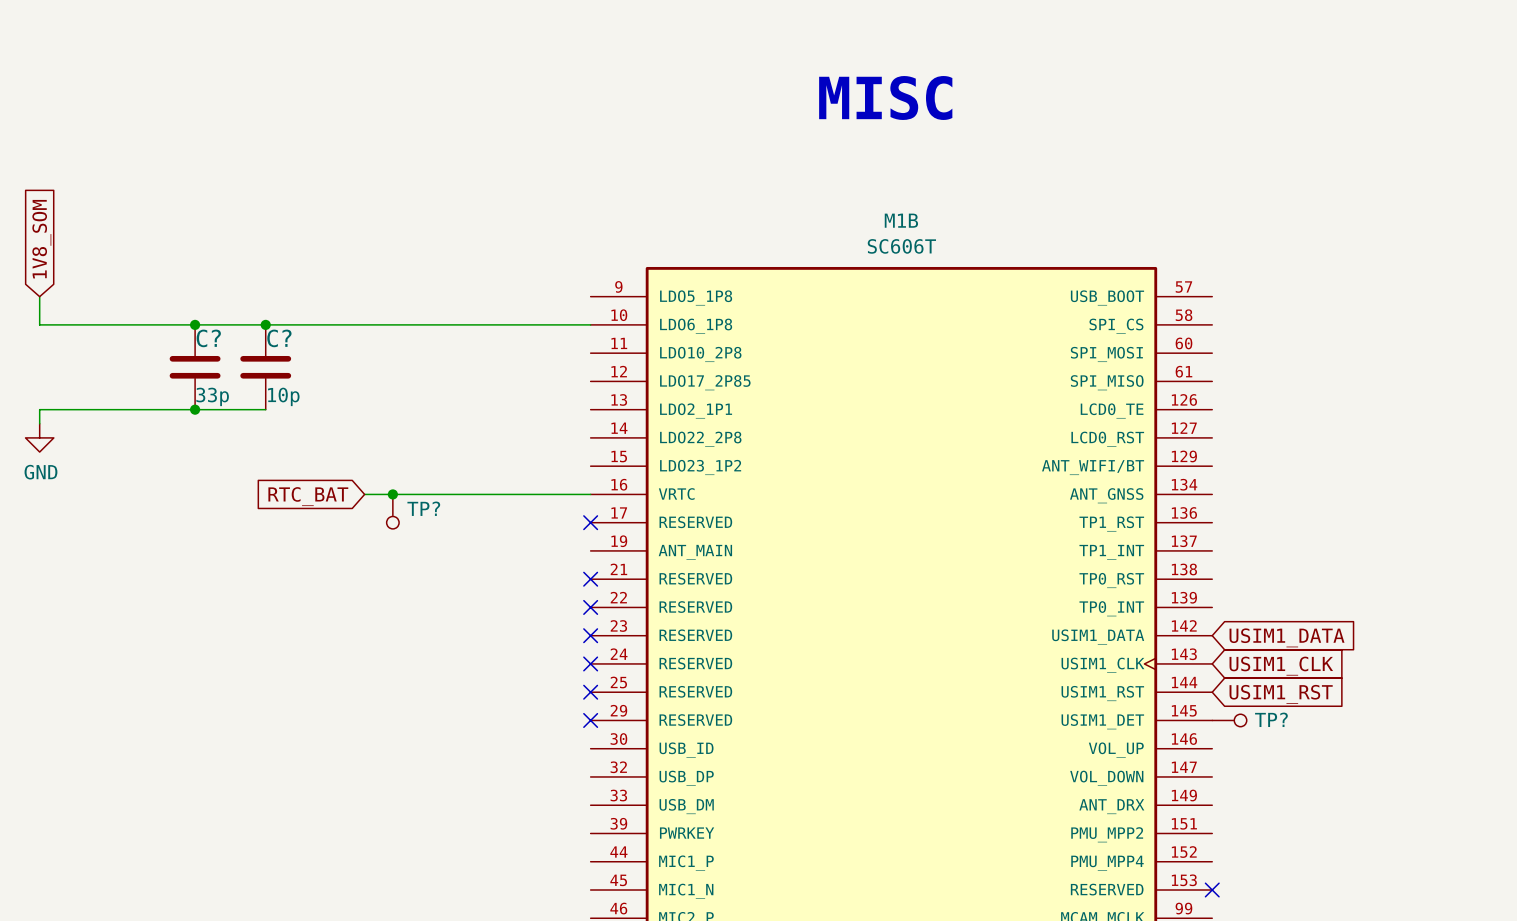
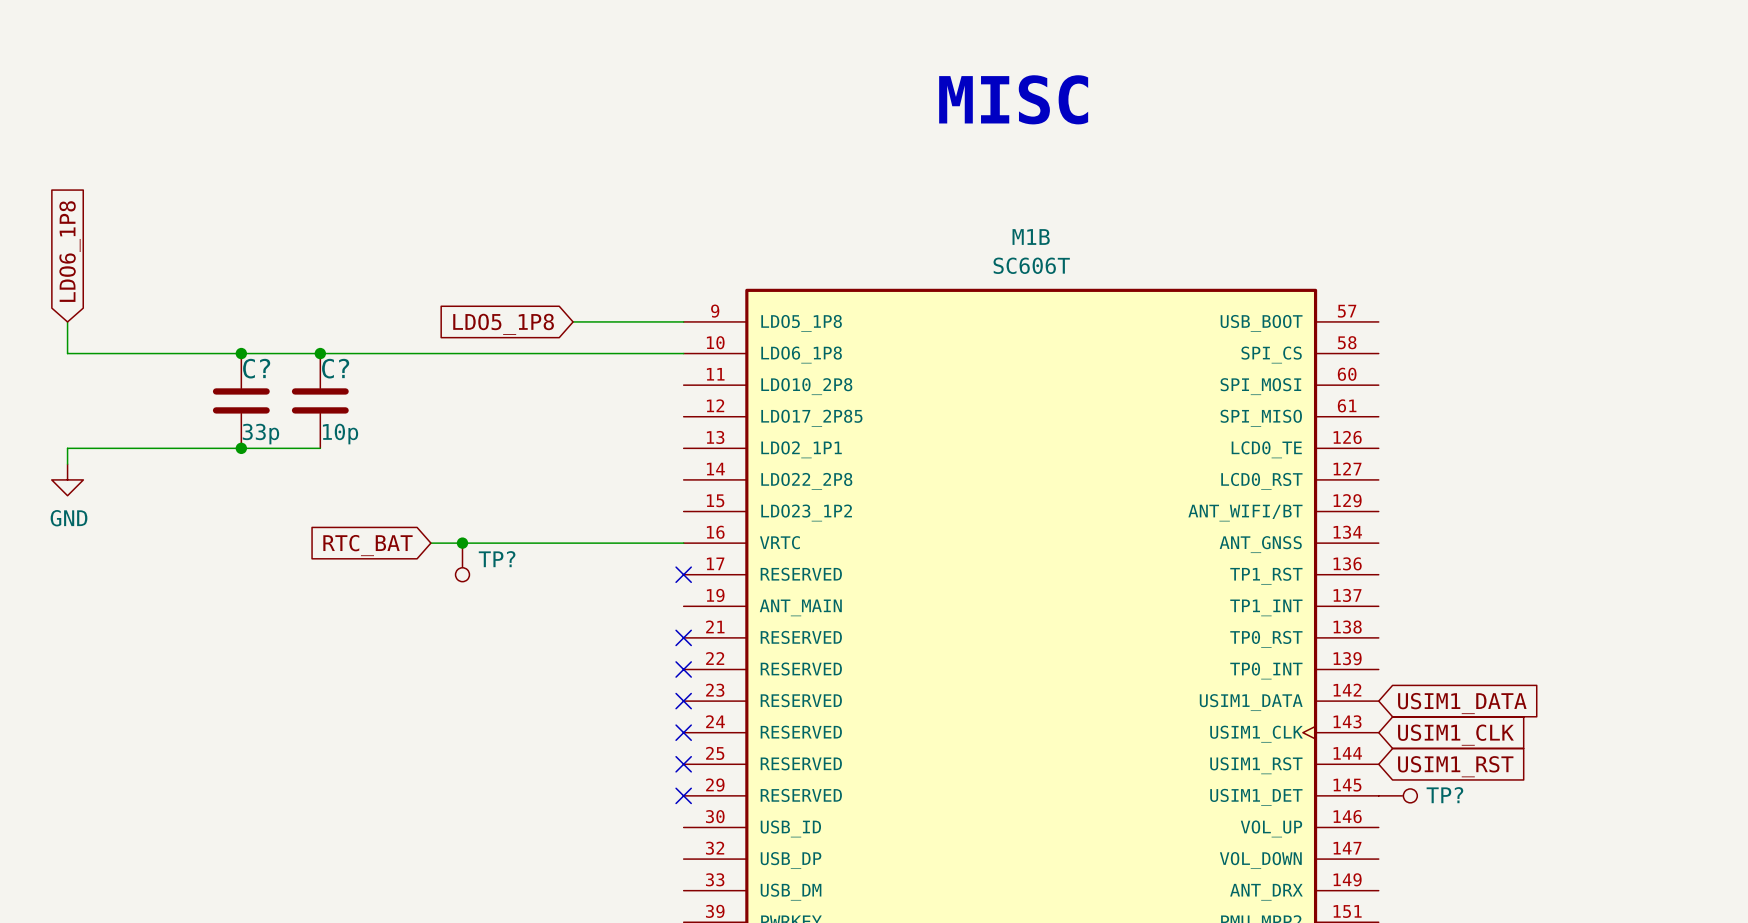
global label: 1V8_SOM (41, 239) -> LDO6_1P8 (69, 251)
wire: none -> (573, 321) (683, 321)
global label: none -> LDO5_1P8 (503, 324)

